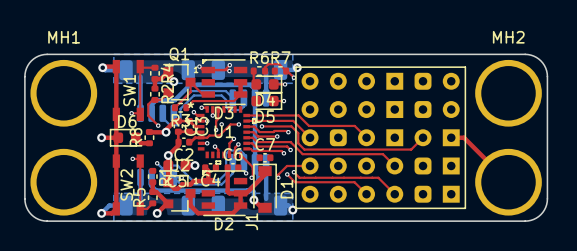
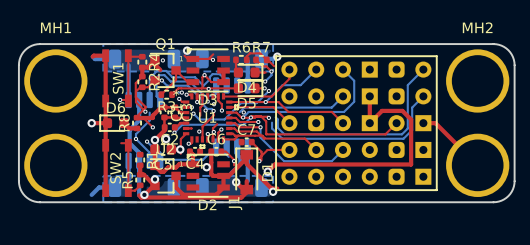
via: (229, 65) -> none
via: (199, 66) -> none
via: (102, 67) -> none
via: none -> (162, 60)
top track: none -> (256, 59) (271, 71)
via: (293, 77) -> none
via position: (173, 81) -> (187, 50)
top track: none -> (289, 69) (289, 78) (271, 96) (223, 96)
bottom track: none -> (316, 69) (300, 85) (282, 85) (265, 102)
bottom track: none -> (343, 69) (354, 80) (354, 101) (344, 111) (248, 111) (243, 117)
bottom track: none -> (423, 69) (407, 85) (407, 128) (401, 134) (284, 134) (277, 127) (277, 119) (275, 117)
bottom track: none -> (271, 71) (271, 75) (265, 81)
via: none -> (271, 71)
via: (285, 84) -> none
top track: none -> (204, 75) (211, 82) (223, 82)
top track: none -> (204, 75) (202, 77) (201, 88)
via: none -> (204, 75)
top track: none -> (142, 76) (135, 83) (135, 97) (146, 107) (137, 117) (143, 117) (152, 127)
bottom track: none -> (161, 80) (167, 85) (188, 85) (202, 100) (202, 104) (207, 108) (213, 110)
via: none -> (161, 80)
via: none -> (265, 81)
top track: (240, 94) (234, 101) -> (238, 88) (217, 88)
bottom track: (232, 98) (225, 91) (191, 91) (173, 108) (173, 113) -> (216, 85) (216, 93) (214, 95) (204, 95) (189, 81) (170, 81) (164, 75) (159, 75) (156, 77) (156, 96) (160, 99)
bottom track: (243, 98) (243, 106) (240, 109) (229, 109) (226, 107) (226, 99) (221, 95) (193, 95) (180, 108) (180, 122) (177, 125) (170, 125) (162, 117) (162, 113) -> (226, 85) (226, 81) (219, 74) (212, 74) (203, 85) (195, 77) (172, 77) (166, 70) (157, 70) (149, 78) (149, 99)
via: none -> (208, 88)
bottom track: none -> (268, 91) (256, 103) (240, 103) (224, 119) (199, 119) (193, 113)
via: none -> (268, 91)
bottom track: none -> (178, 92) (181, 92)
via: none -> (181, 92)
bottom track: none -> (343, 96) (331, 107) (244, 107) (239, 112)
top track: none -> (369, 96) (369, 123) (382, 110) (402, 110) (411, 119) (411, 164) (275, 164) (267, 171)
bottom track: none -> (423, 96) (412, 107) (412, 130) (403, 138) (282, 138) (272, 128) (272, 122)
bottom track: (151, 113) (151, 104) (156, 100) (174, 100) (189, 84) (250, 84) (255, 89) (255, 162) -> (139, 99) (139, 120) (129, 130) (129, 143) (139, 152) (139, 160)
via: none -> (207, 101)
via: none -> (265, 102)
via: none -> (214, 104)
via: none -> (213, 110)
top track: (238, 124) (230, 124) (219, 135) (201, 137) -> (221, 110) (221, 104) (218, 100) (218, 96)
bottom track: none -> (149, 112) (149, 120) (135, 134) (135, 138) (144, 147)
top track: (261, 126) (291, 126) (298, 133) (298, 143) (304, 149) -> (250, 117) (260, 116) (266, 121) (266, 134) (284, 134)
via: none -> (193, 113)
via: (216, 129) -> none
via: none -> (243, 117)
bottom track: none -> (250, 117) (243, 124) (182, 124) (174, 132)
via: none -> (250, 117)
via position: (166, 132) -> (166, 138)
via: (233, 138) -> none
via: none -> (152, 127)
bottom track: none -> (260, 127) (260, 137) (284, 161) (331, 161) (343, 149)
top track: (279, 142) (290, 142) (302, 154) (382, 154) (394, 165) -> none
via: none -> (260, 127)
via: (207, 143) -> none
top track: (215, 146) (218, 149) (218, 154) -> (213, 110) (213, 115) (202, 126) (202, 139)
top track: (275, 146) (287, 146) (290, 149) -> (256, 131) (264, 138) (304, 138) (316, 149)
via: none -> (174, 132)
via: none -> (213, 132)
top track: none -> (186, 133) (180, 139) (180, 153)
via: none -> (207, 134)
via: (290, 149) -> none
via: (283, 153) -> none
via: none -> (135, 138)
top track: none -> (191, 139) (191, 142) (188, 143)
top track: (240, 154) (252, 167) (251, 177) -> (223, 139) (234, 139) (238, 135)
via: none -> (147, 141)
top track: none -> (251, 142) (261, 151) (261, 160)
via: (132, 158) -> none
via: none -> (188, 143)
bottom track: (232, 162) (232, 173) (221, 184) (180, 184) (173, 177) (181, 177) -> (216, 146) (202, 159) (160, 160) (160, 152) (147, 141)
bottom track: (243, 162) (243, 153) (240, 150) (229, 150) (226, 153) (226, 173) (219, 179) (192, 179) (177, 165) (166, 165) (162, 168) -> none
via: (157, 163) -> none
top track: none -> (221, 151) (225, 151) (234, 159) (234, 165)
top track: (293, 172) (299, 177) (378, 177) (394, 194) -> none
via: (293, 172) -> none
via: (246, 173) -> none
top track: none -> (246, 158) (246, 163) (271, 188) (277, 188)
top track: (287, 174) (295, 182) (354, 182) (366, 194) -> none
via: (287, 174) -> none
via: none -> (206, 167)
bottom track: (151, 186) (156, 190) (252, 190) (253, 200) -> (139, 169) (139, 195)
via: none -> (267, 171)
via: none -> (154, 179)
top track: none -> (246, 181) (246, 192) (241, 197) (141, 197) (139, 195)
top track: (116, 208) (111, 213) (101, 213) -> none
via: (101, 213) -> none

